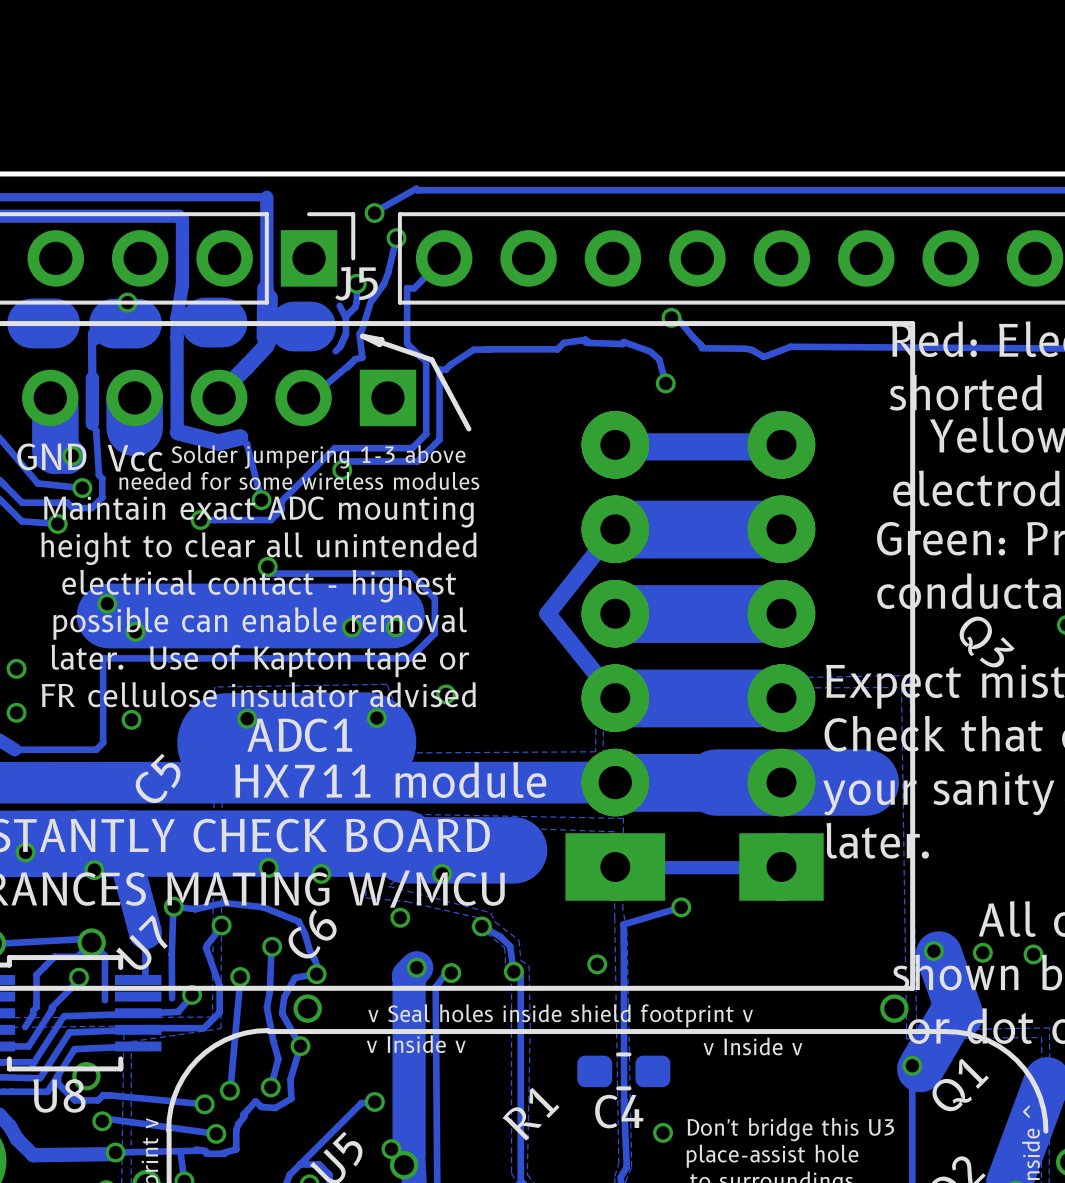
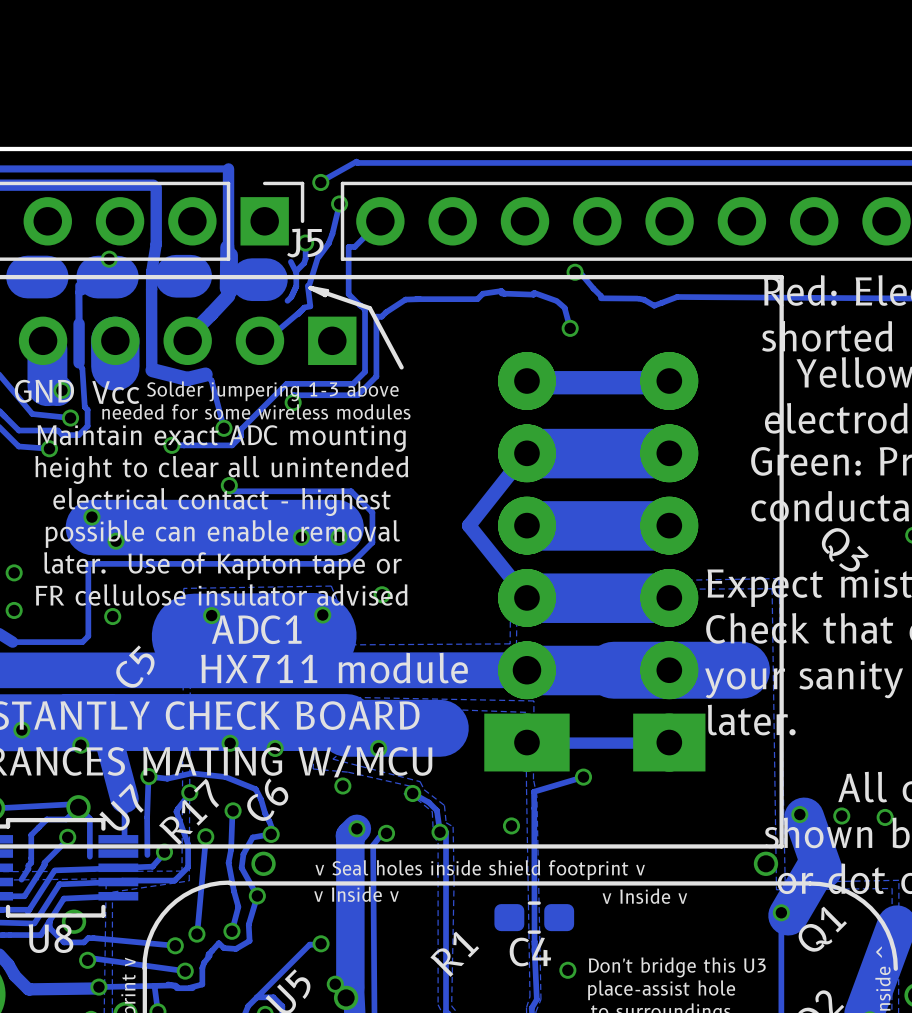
text: none -> R17 (189, 811)

